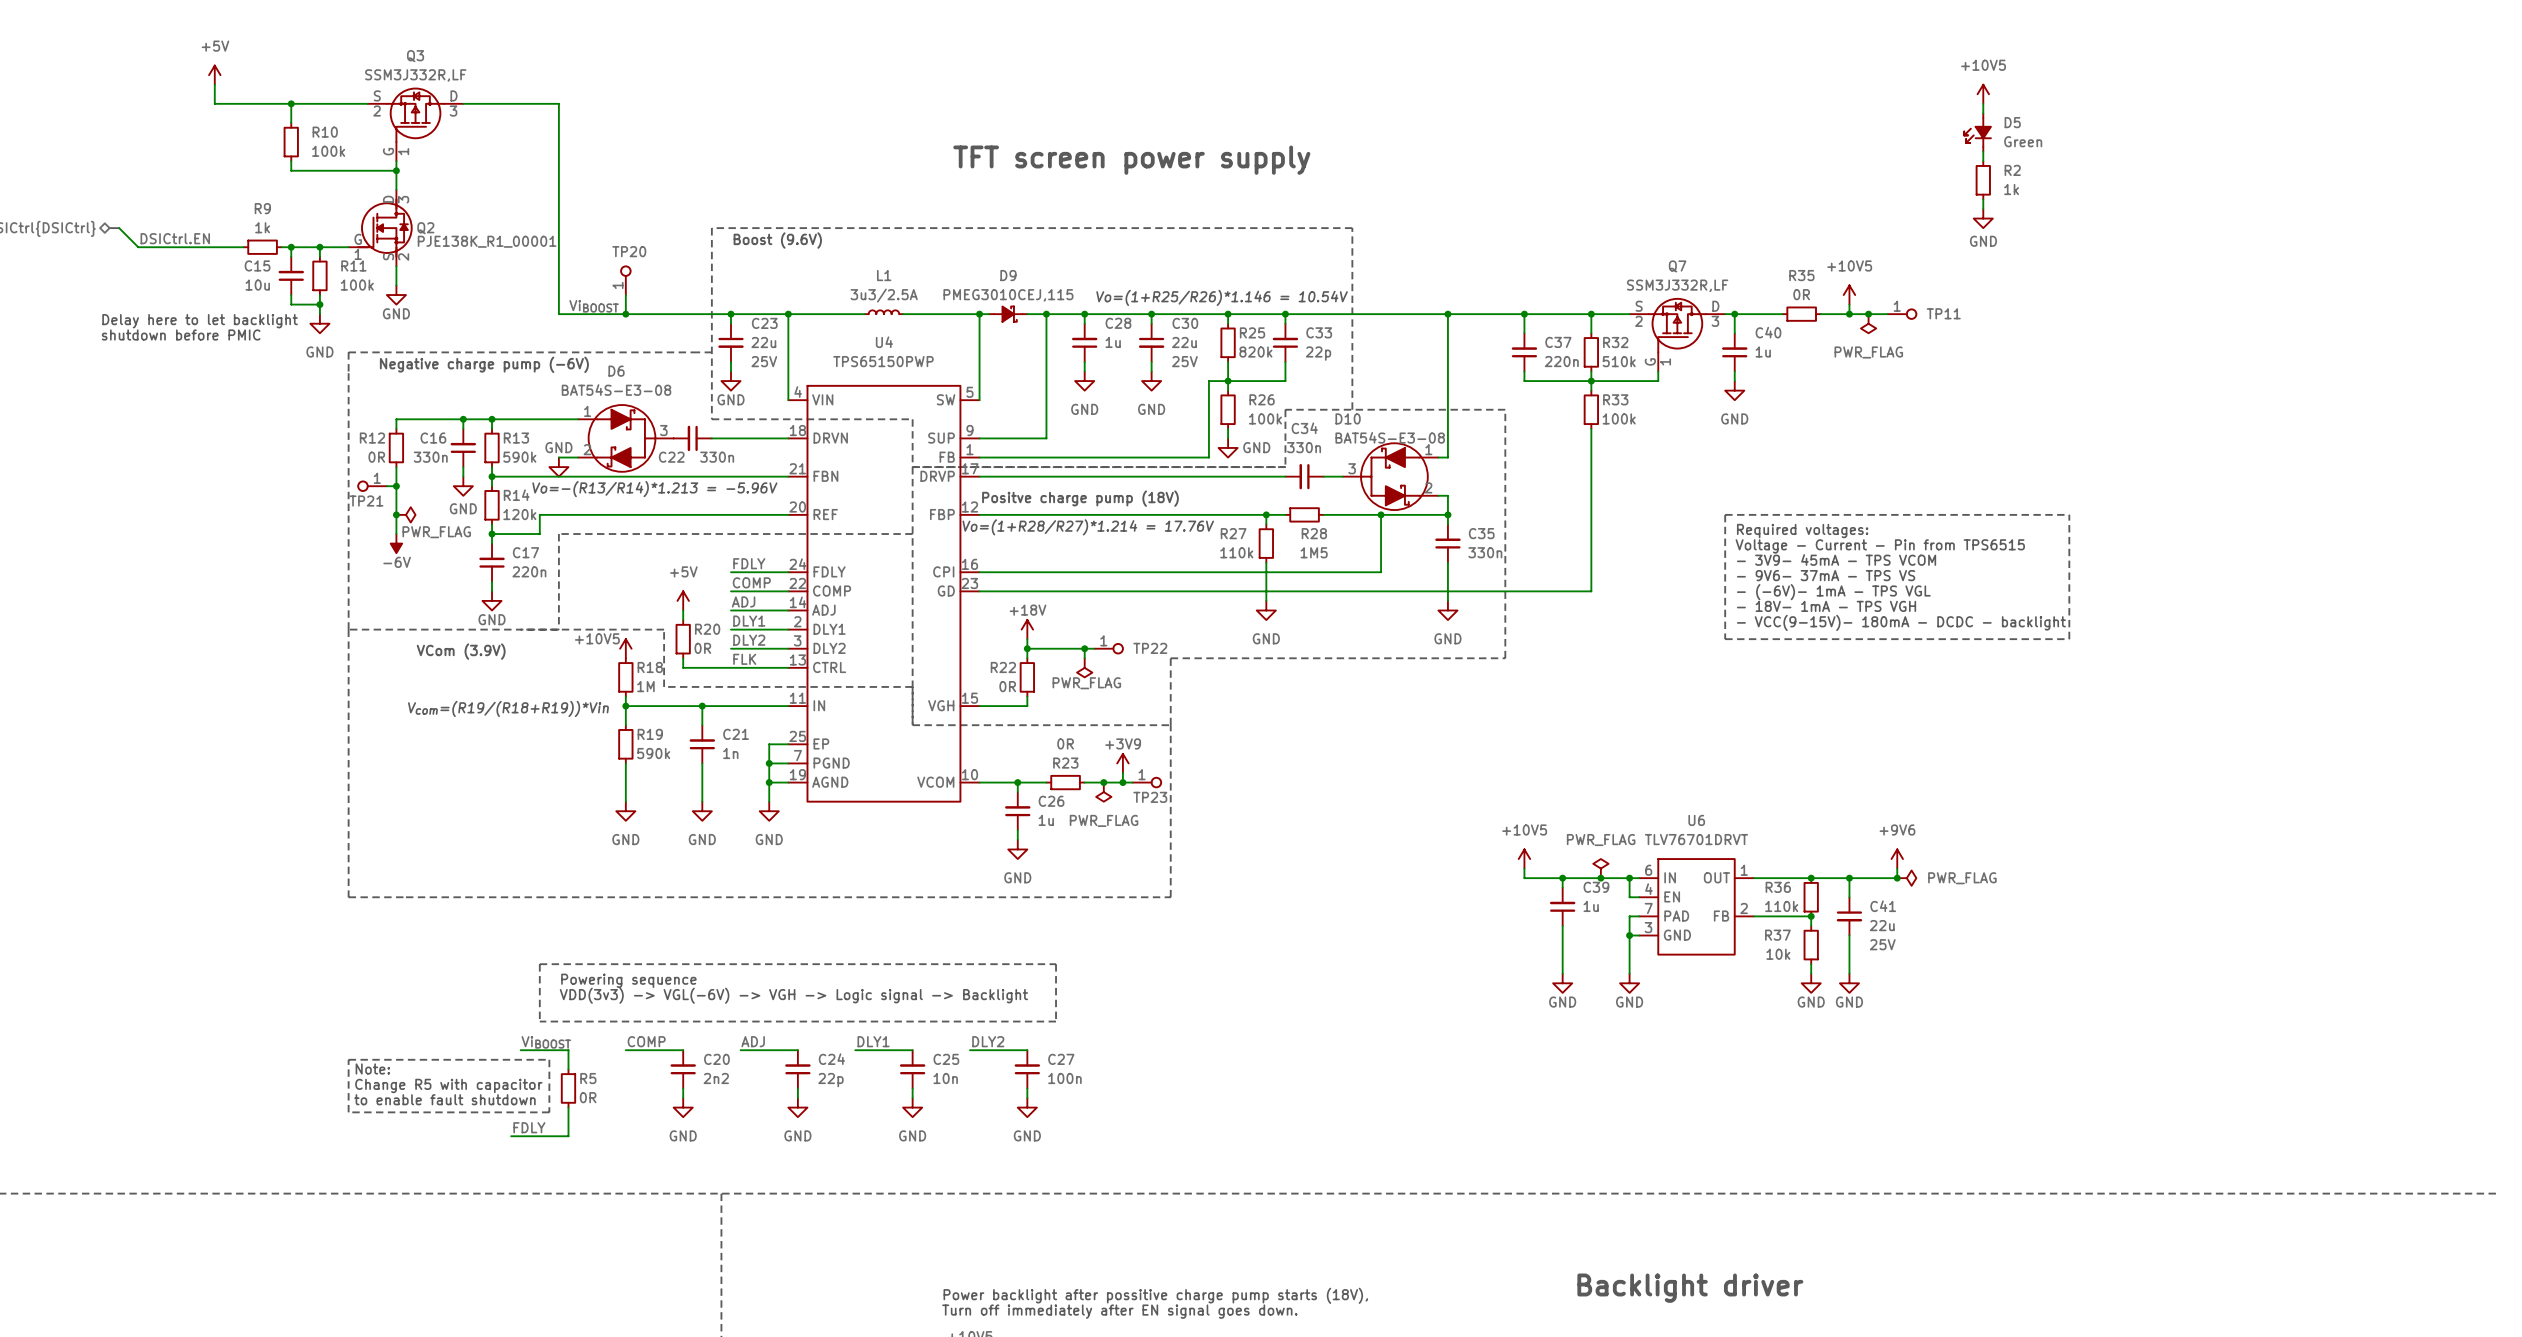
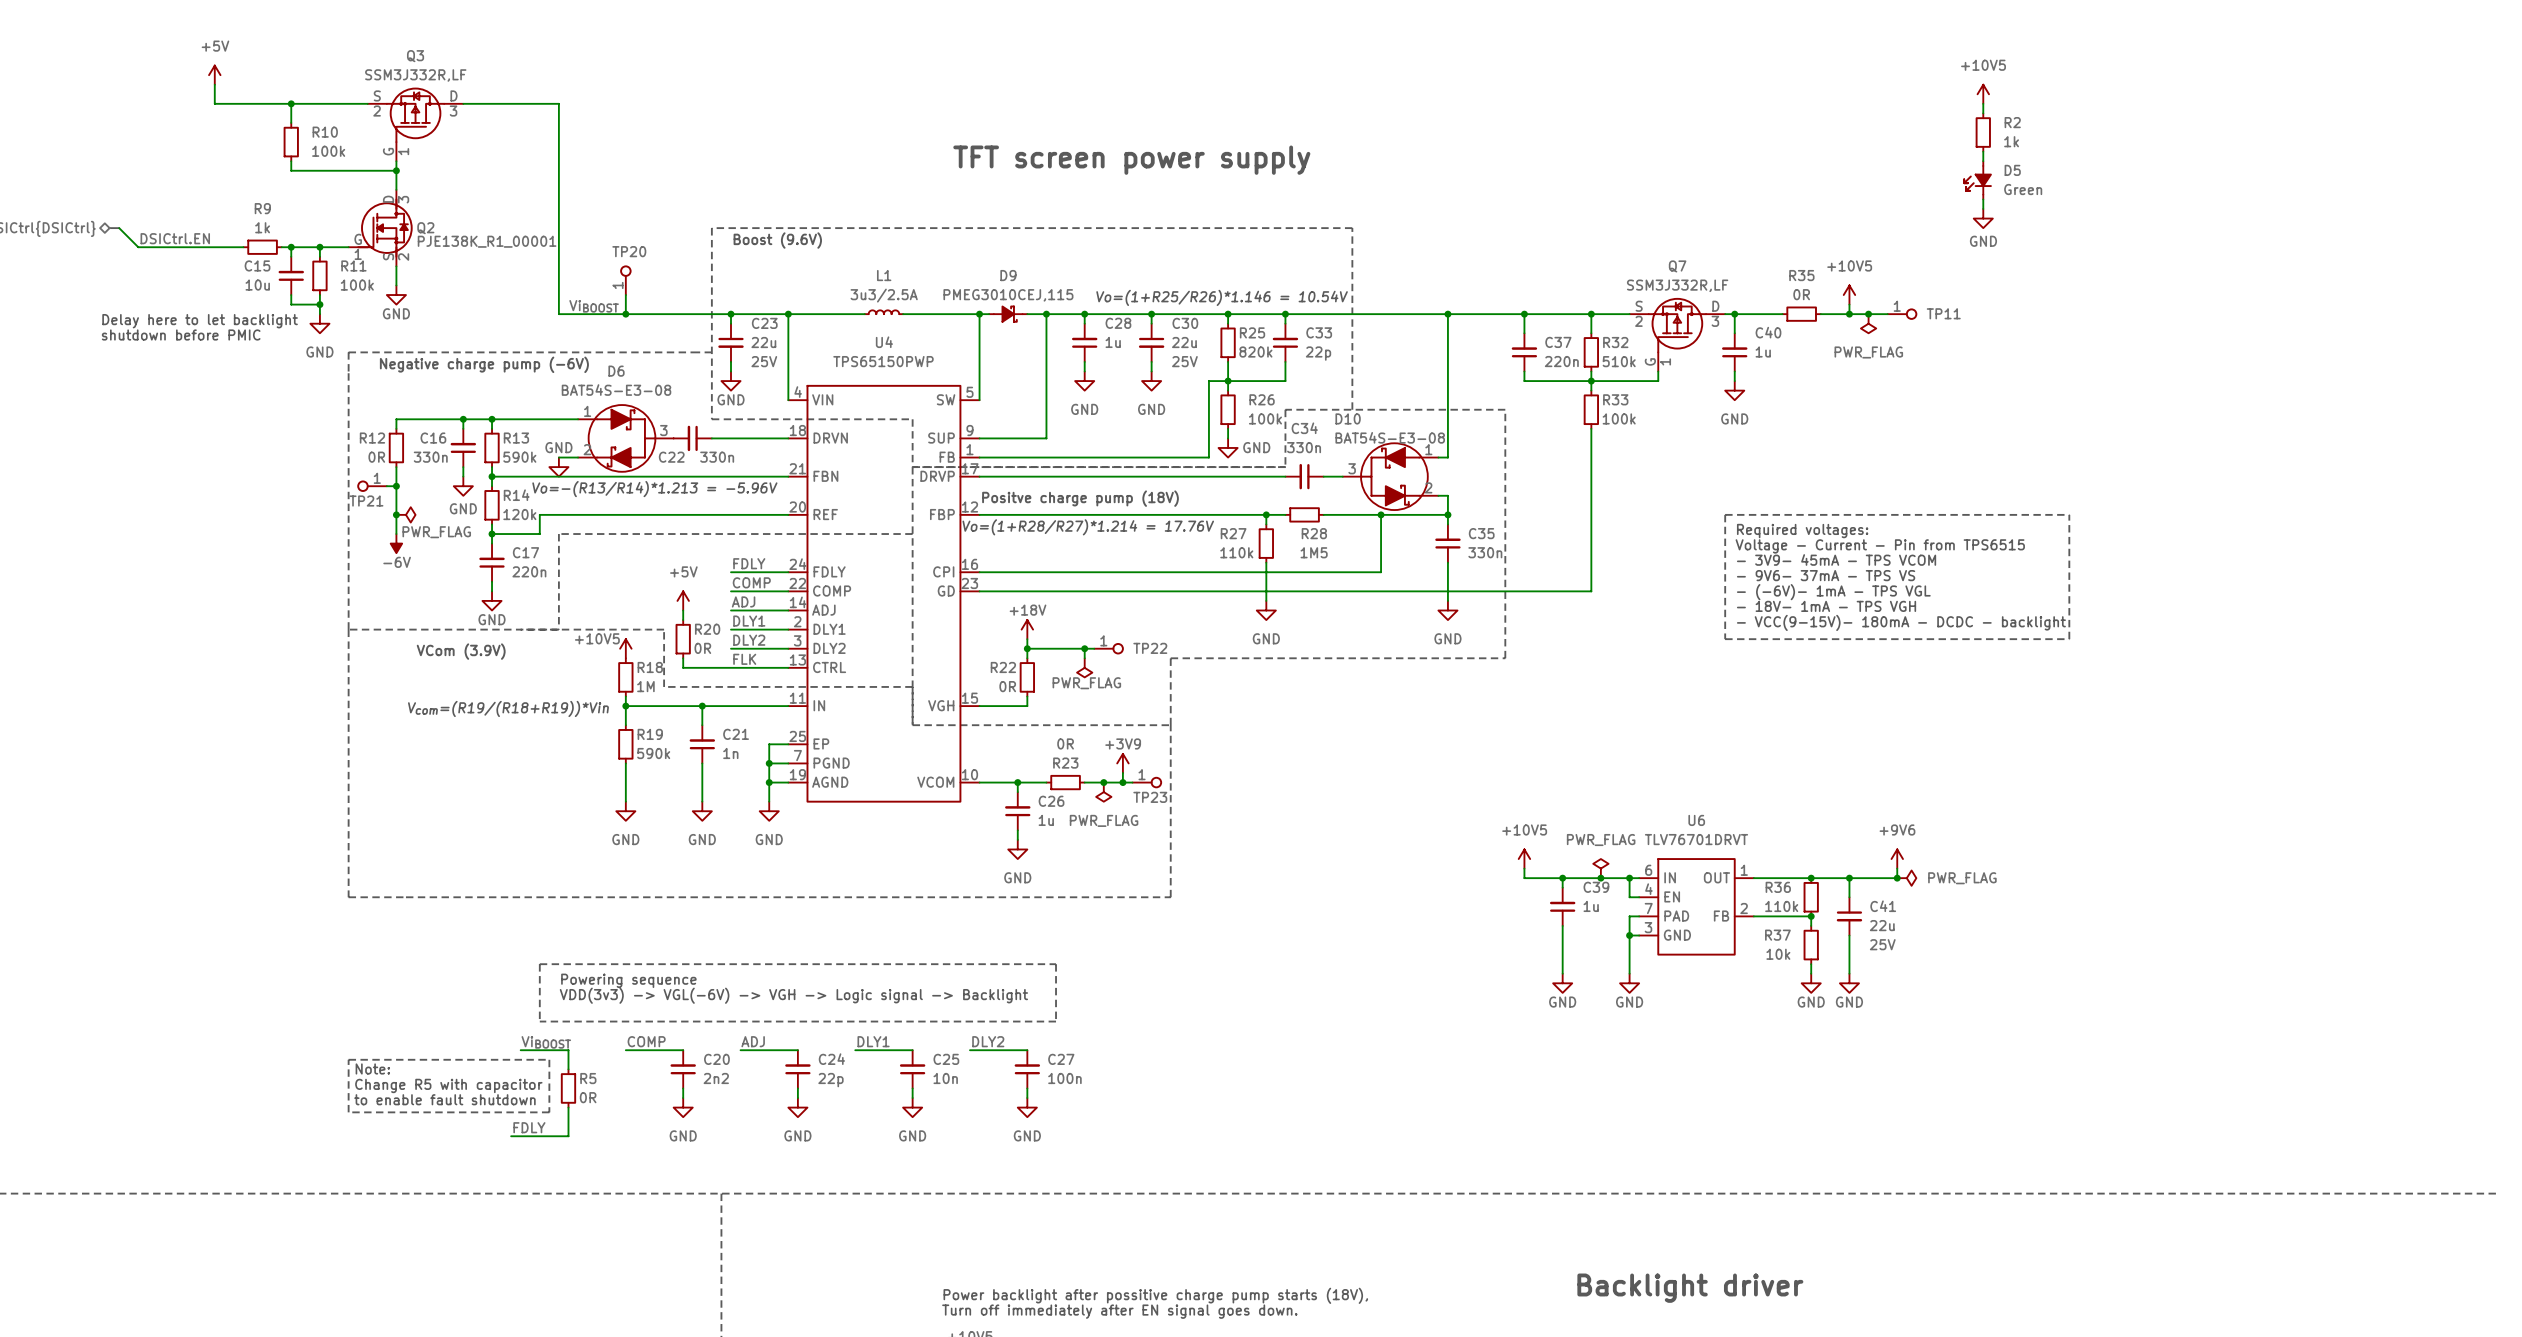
D5 position: (1977, 132) -> (1977, 180)
R2 position: (1983, 180) -> (1983, 132)

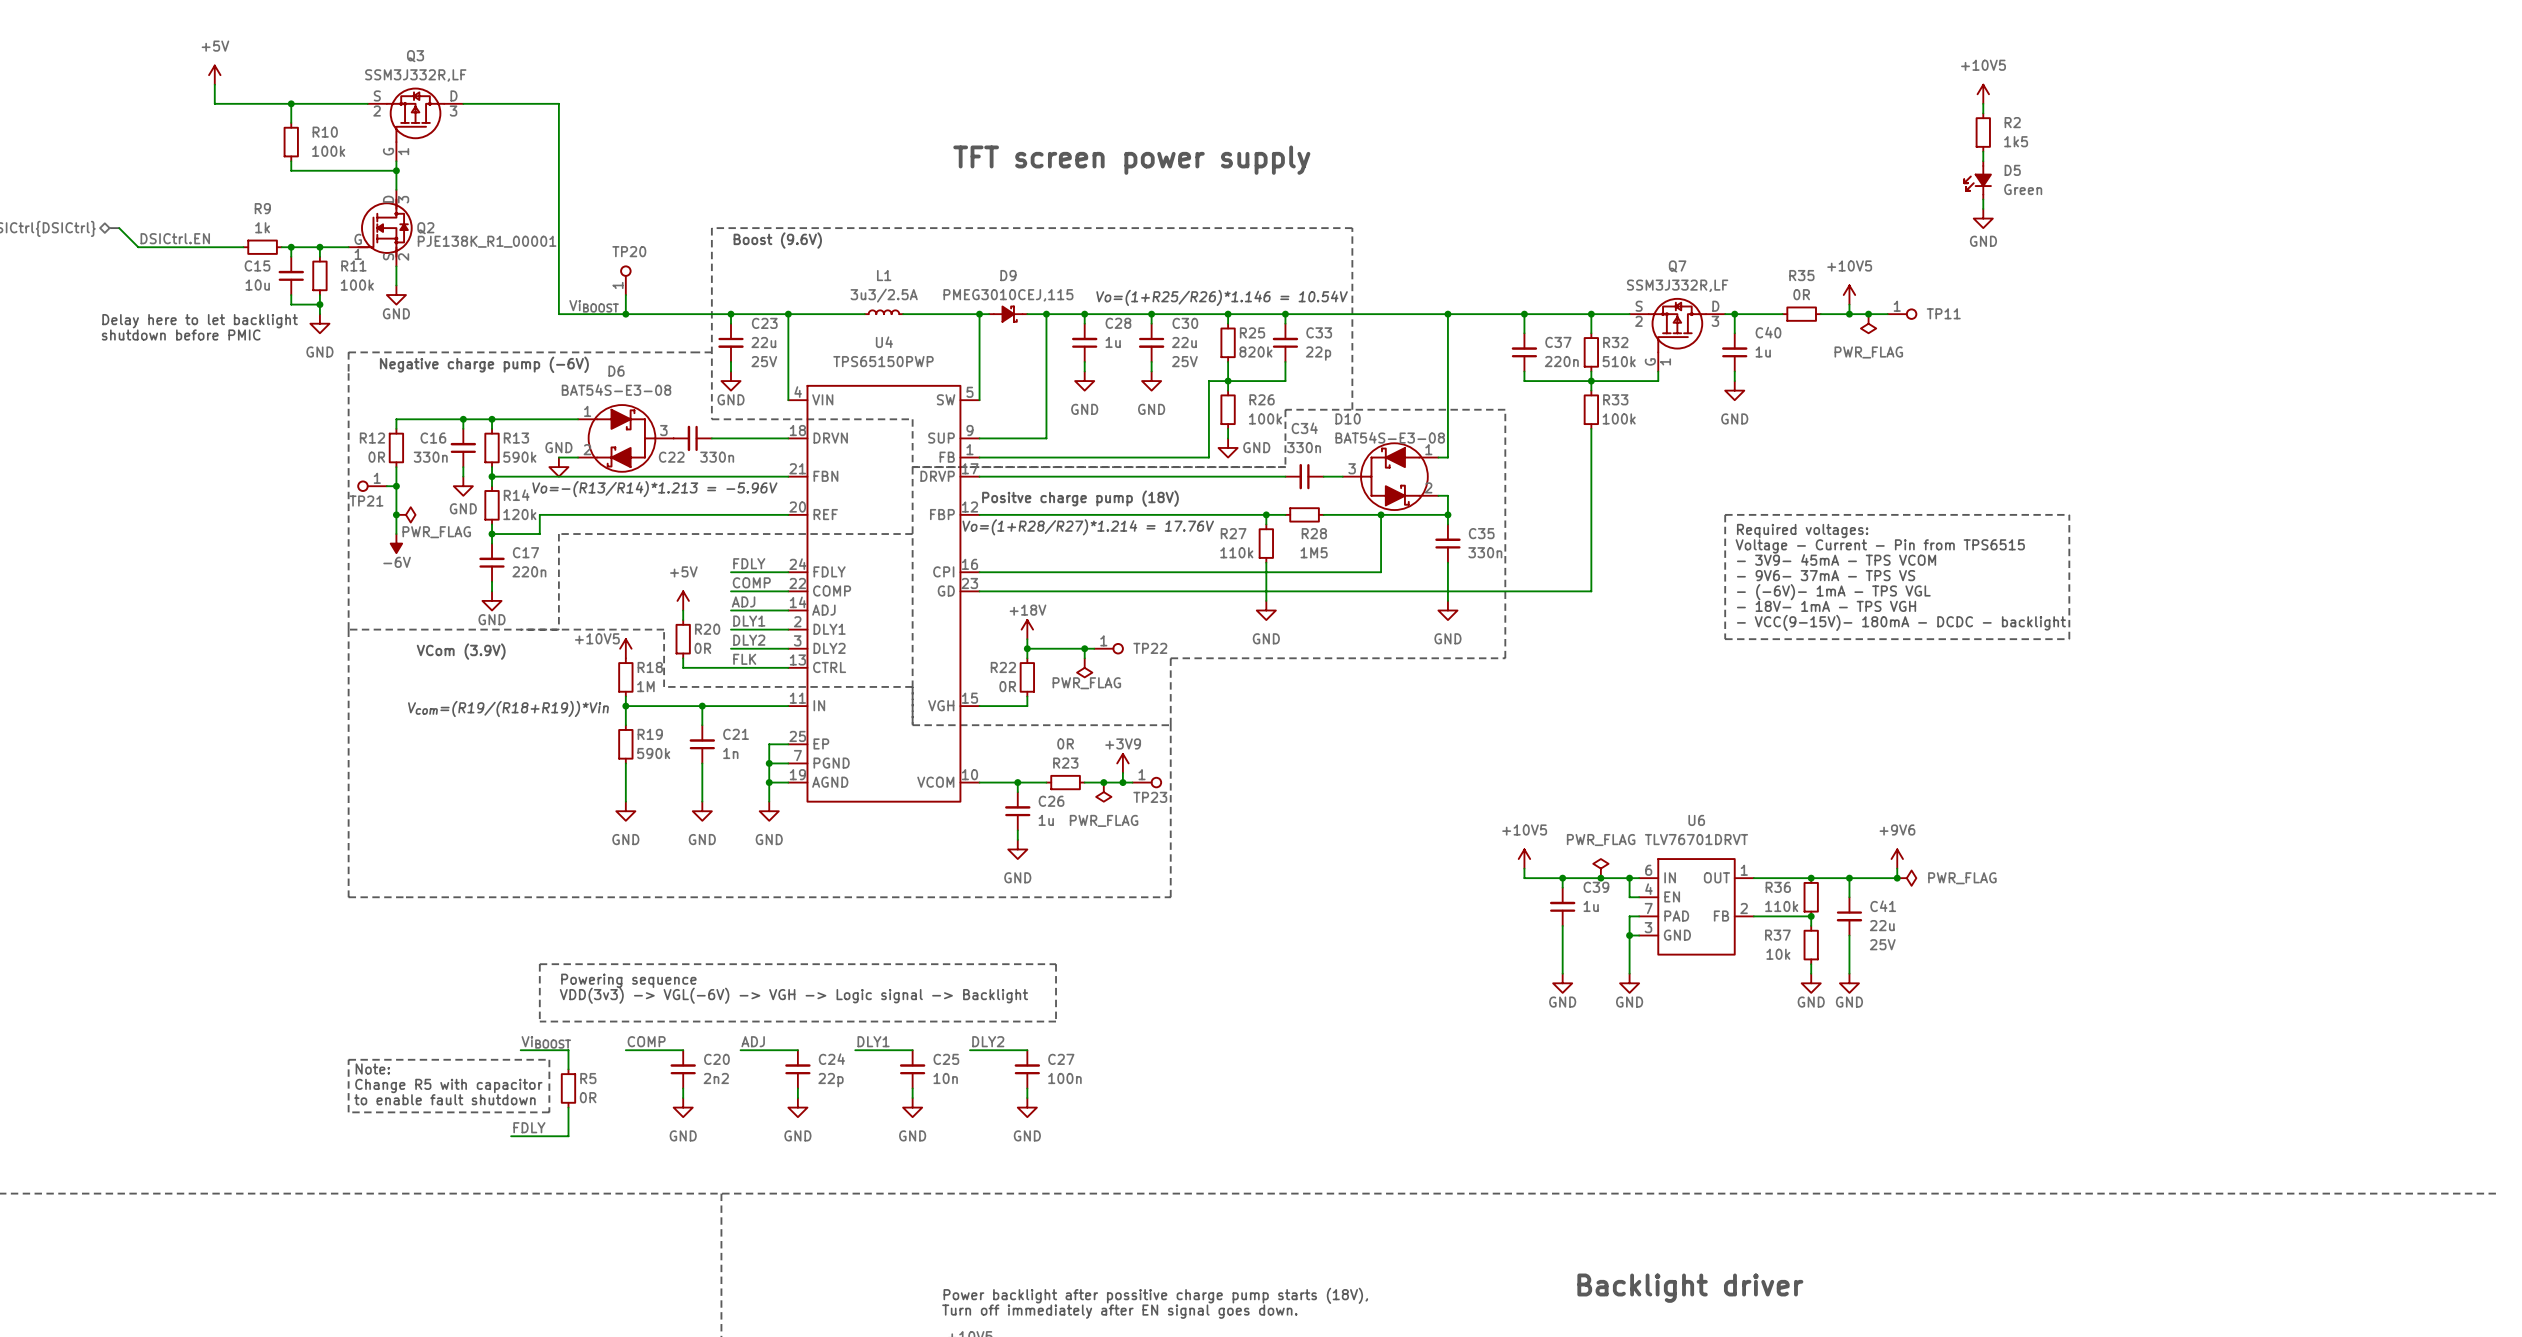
R2 text: 1k (2011, 141) -> 1k5 (2016, 141)

